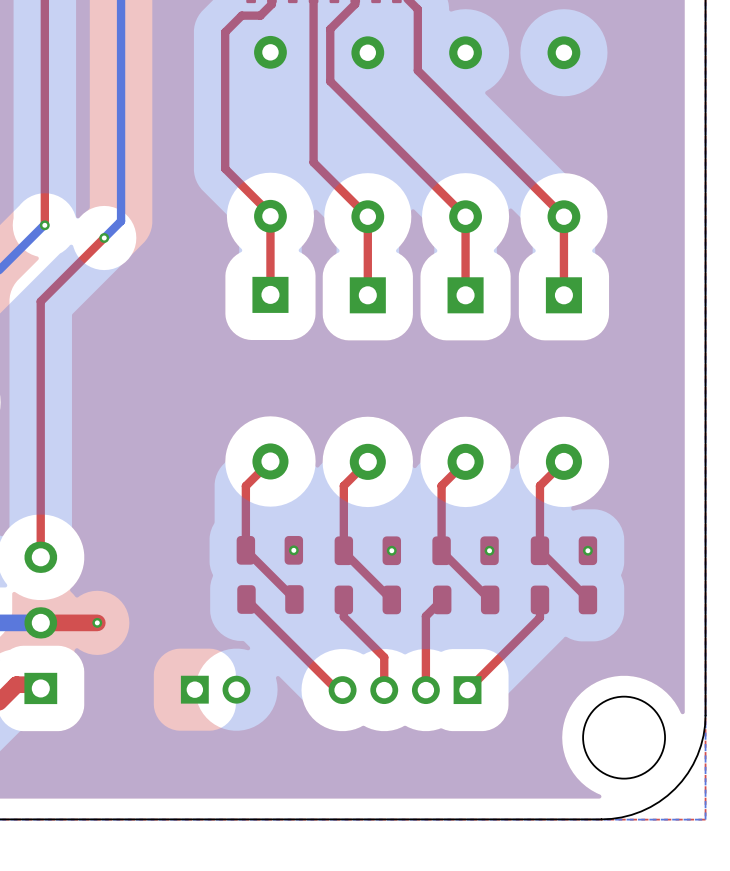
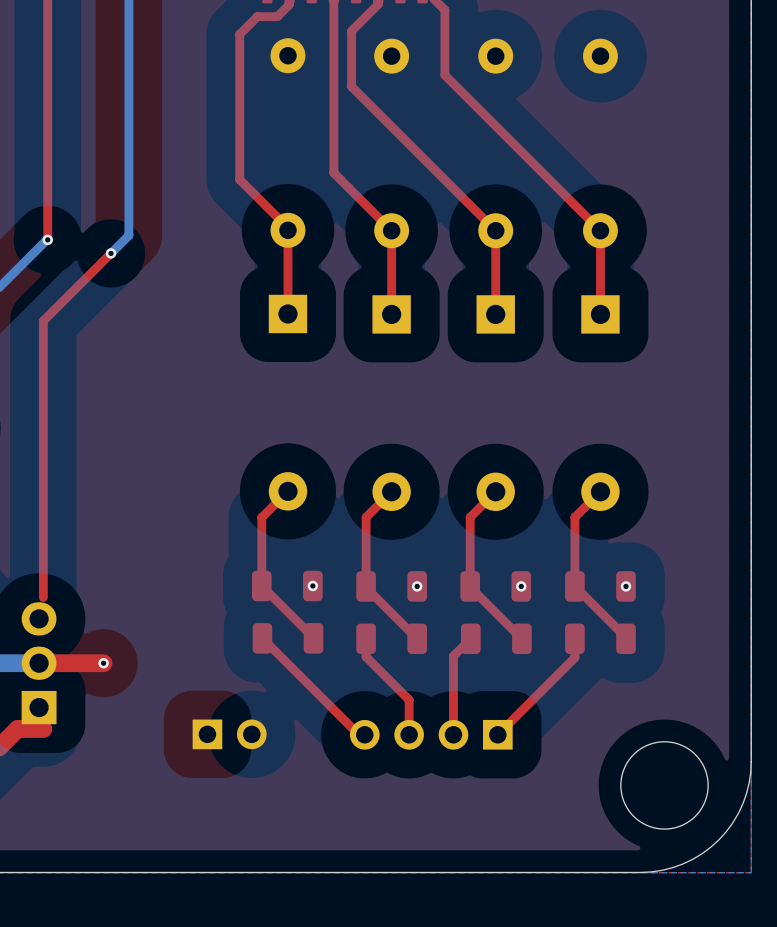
part footprint: [24, 541, 58, 705] -> [21, 602, 57, 725]

